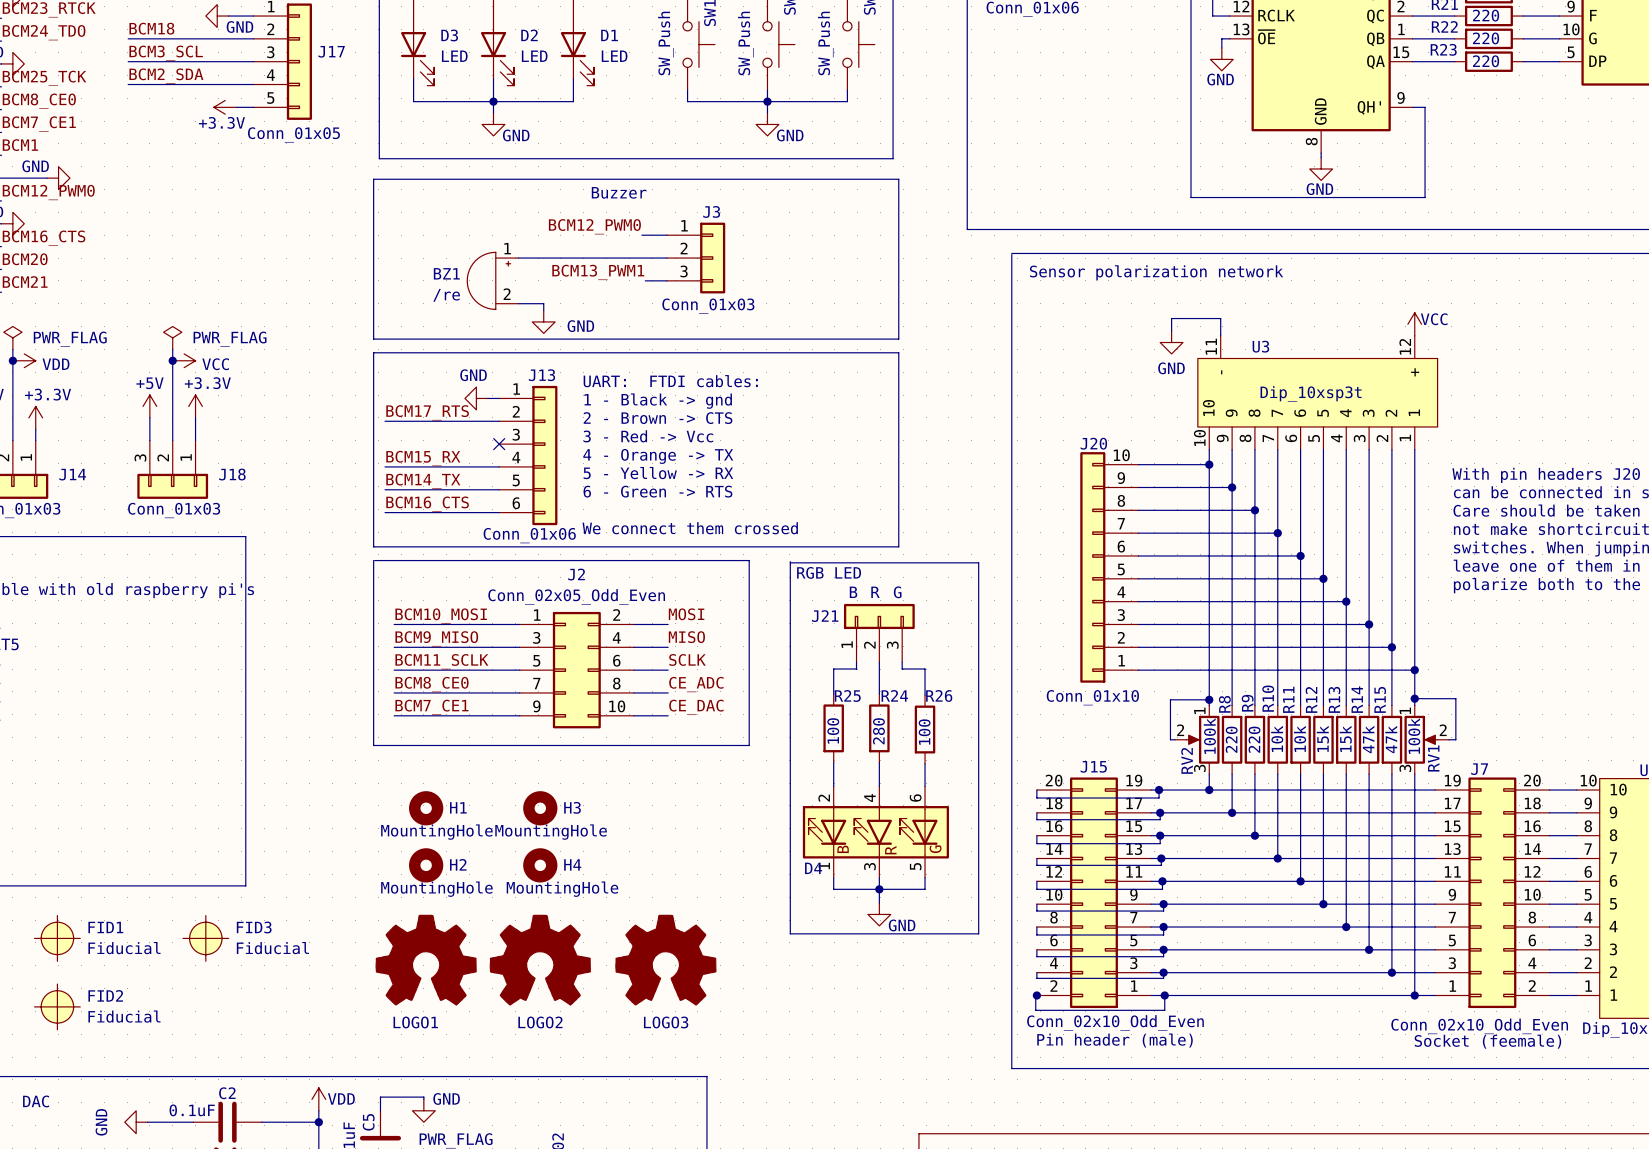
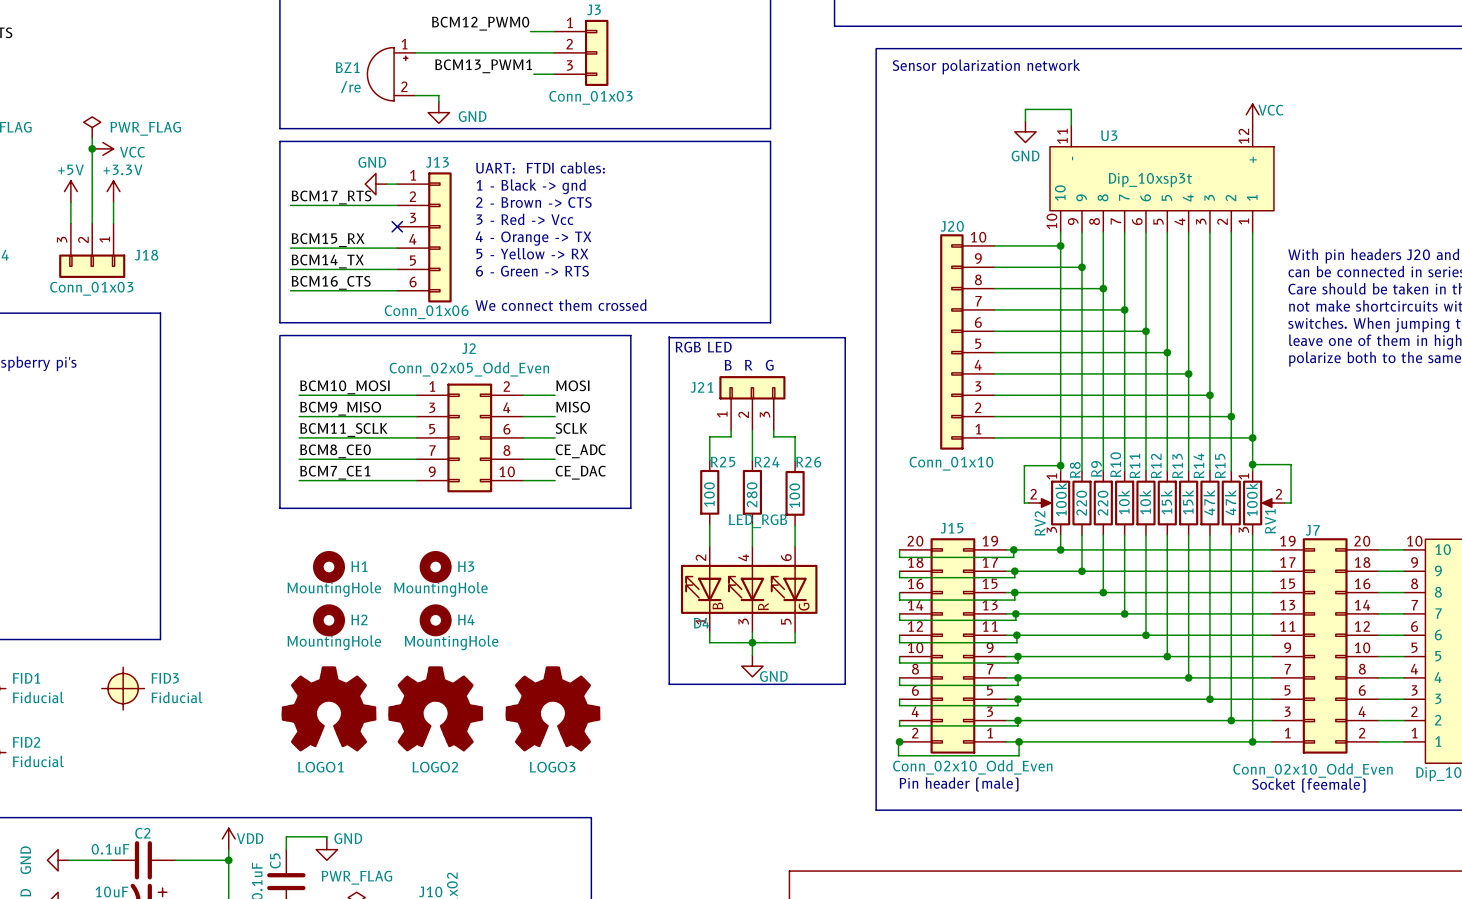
D4 value: none -> LED_RGB (758, 521)
D4 symbol: [802, 786, 949, 878] -> [680, 546, 818, 633]

